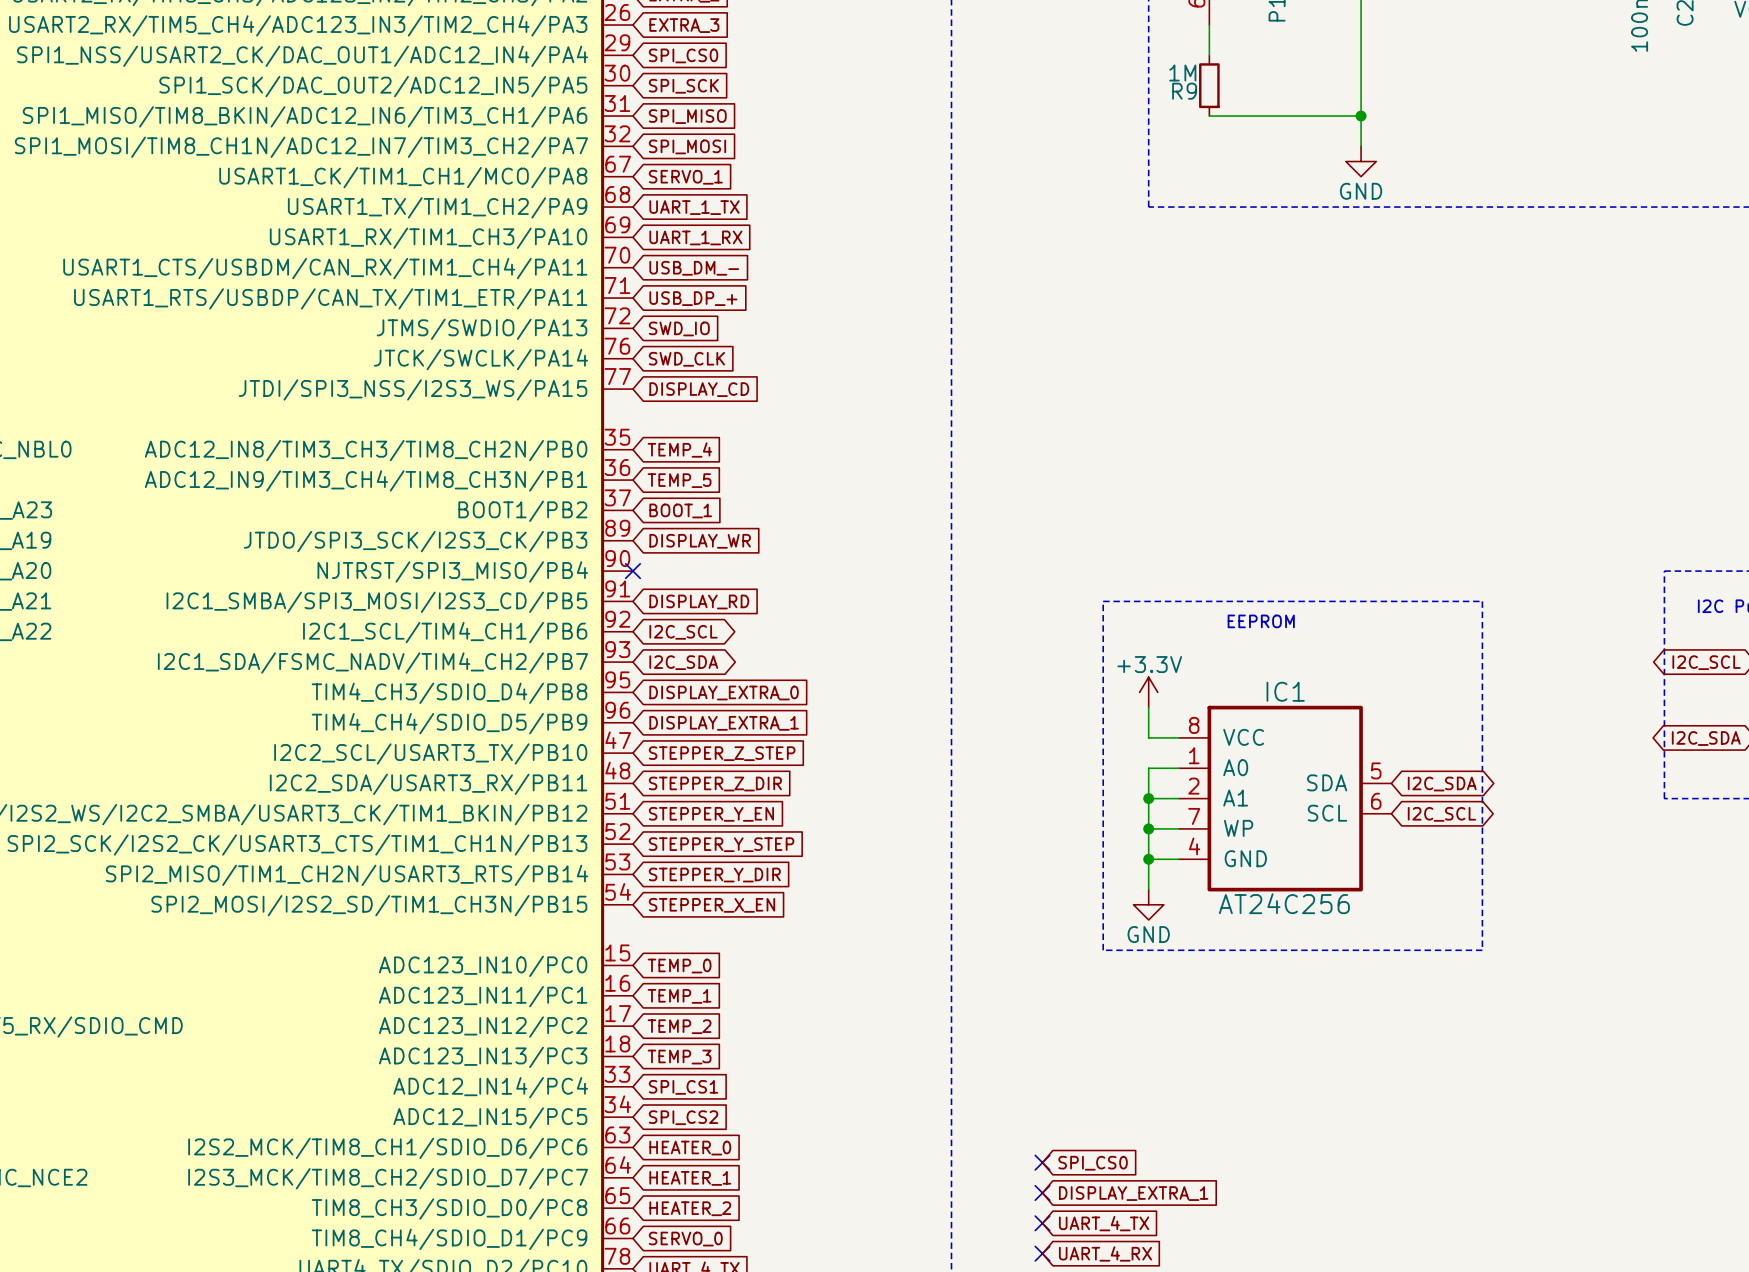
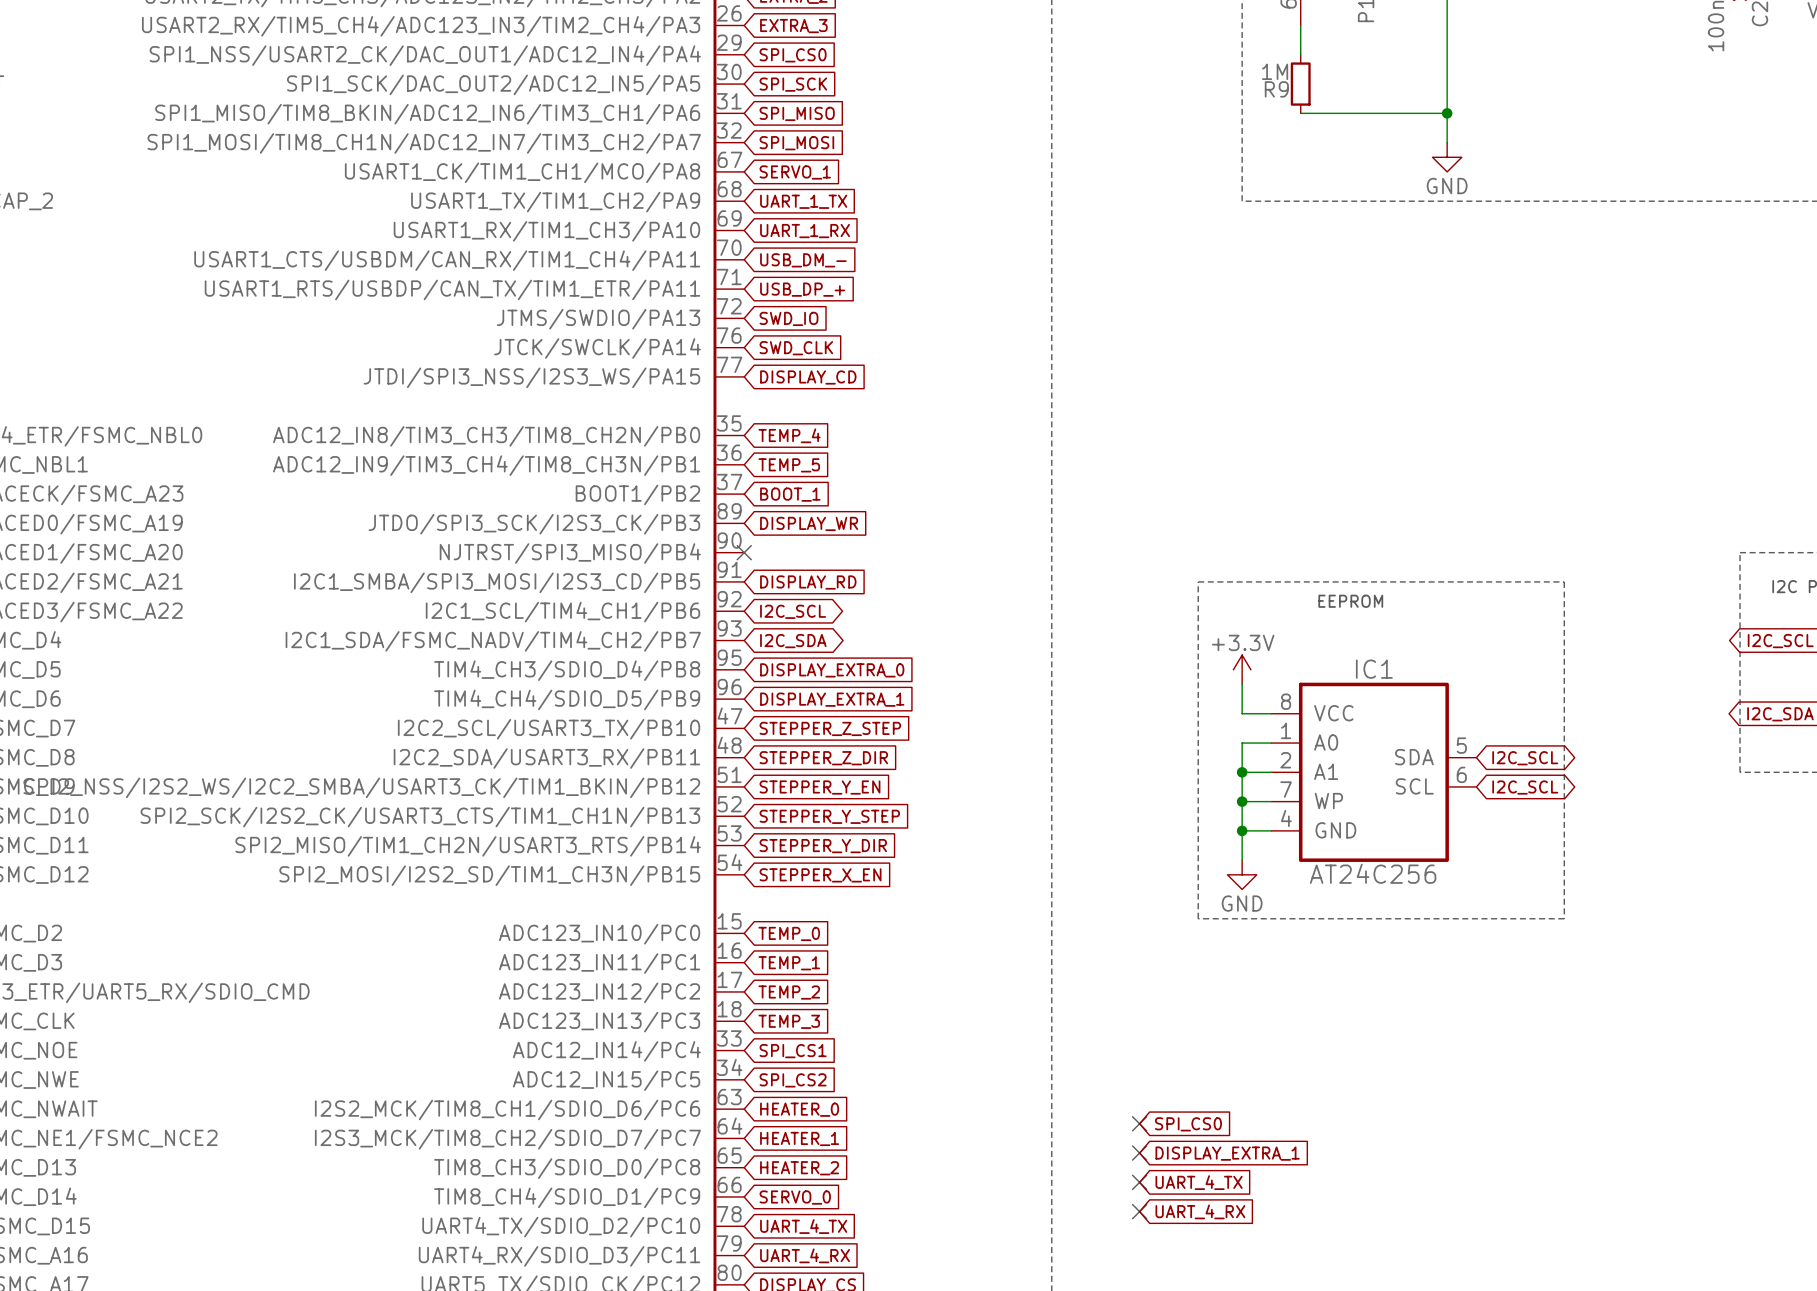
global label: I2C_SDA (1442, 784) -> I2C_SCL (1525, 758)

